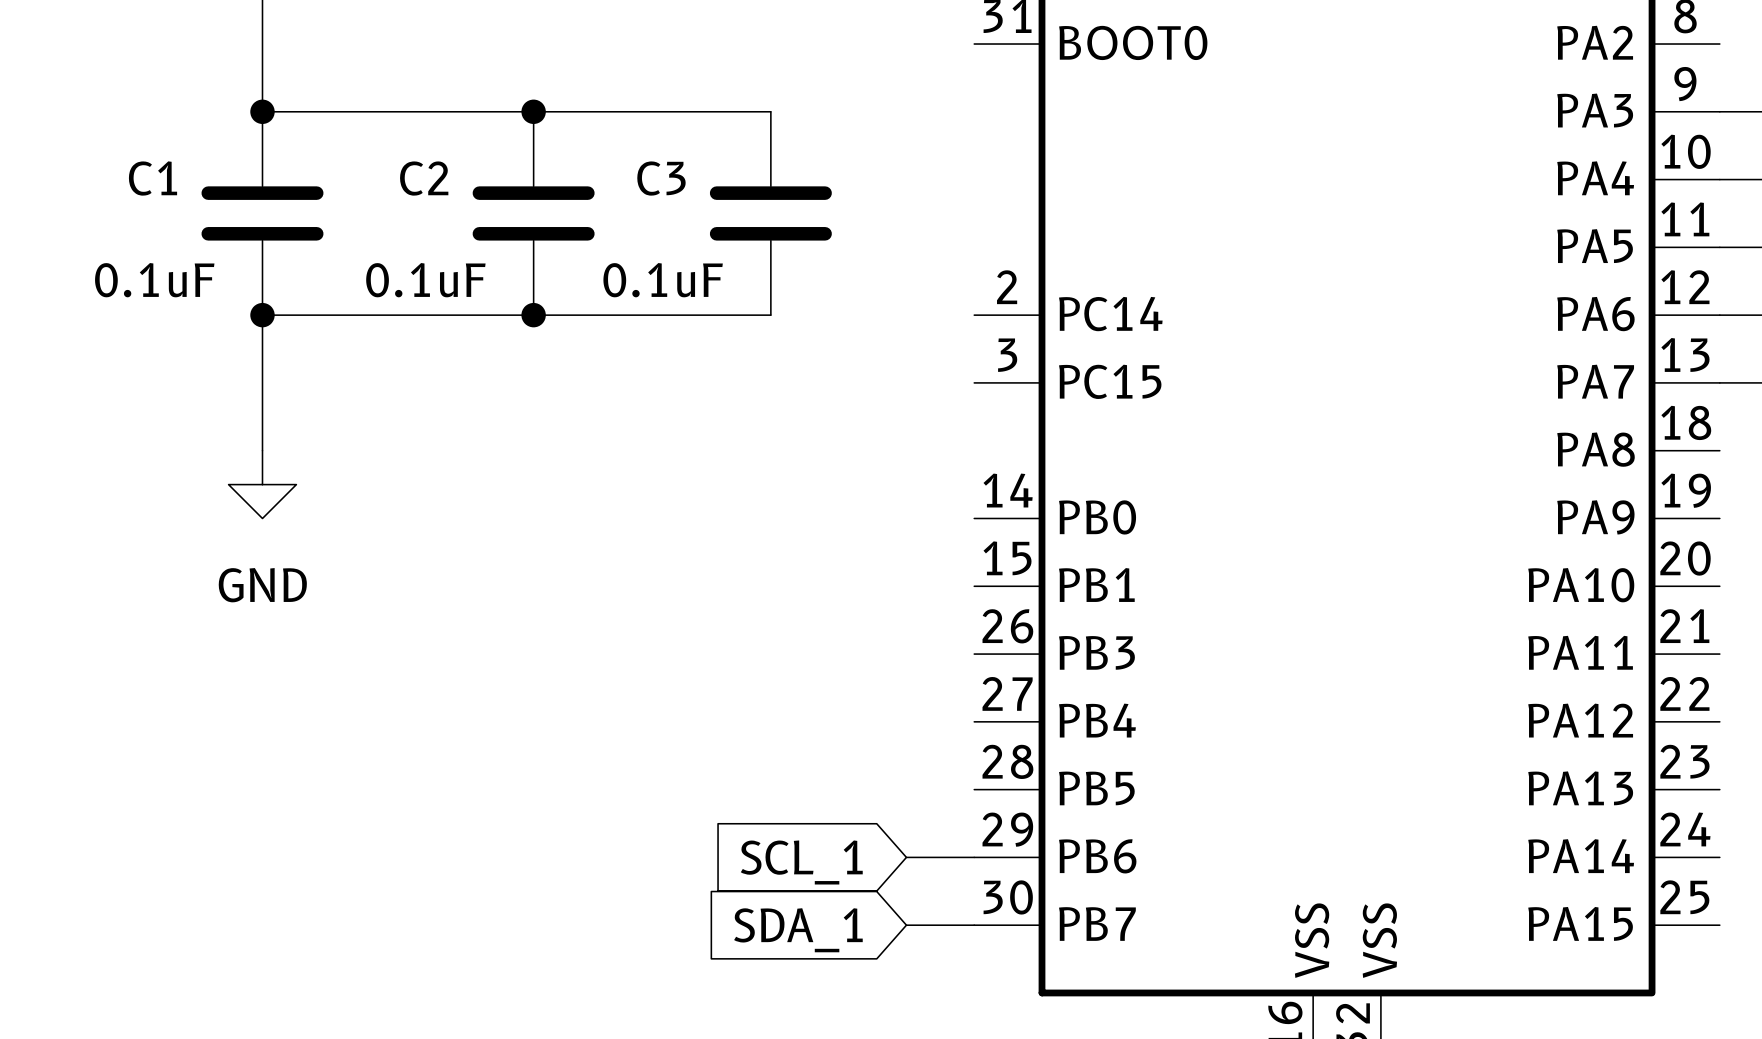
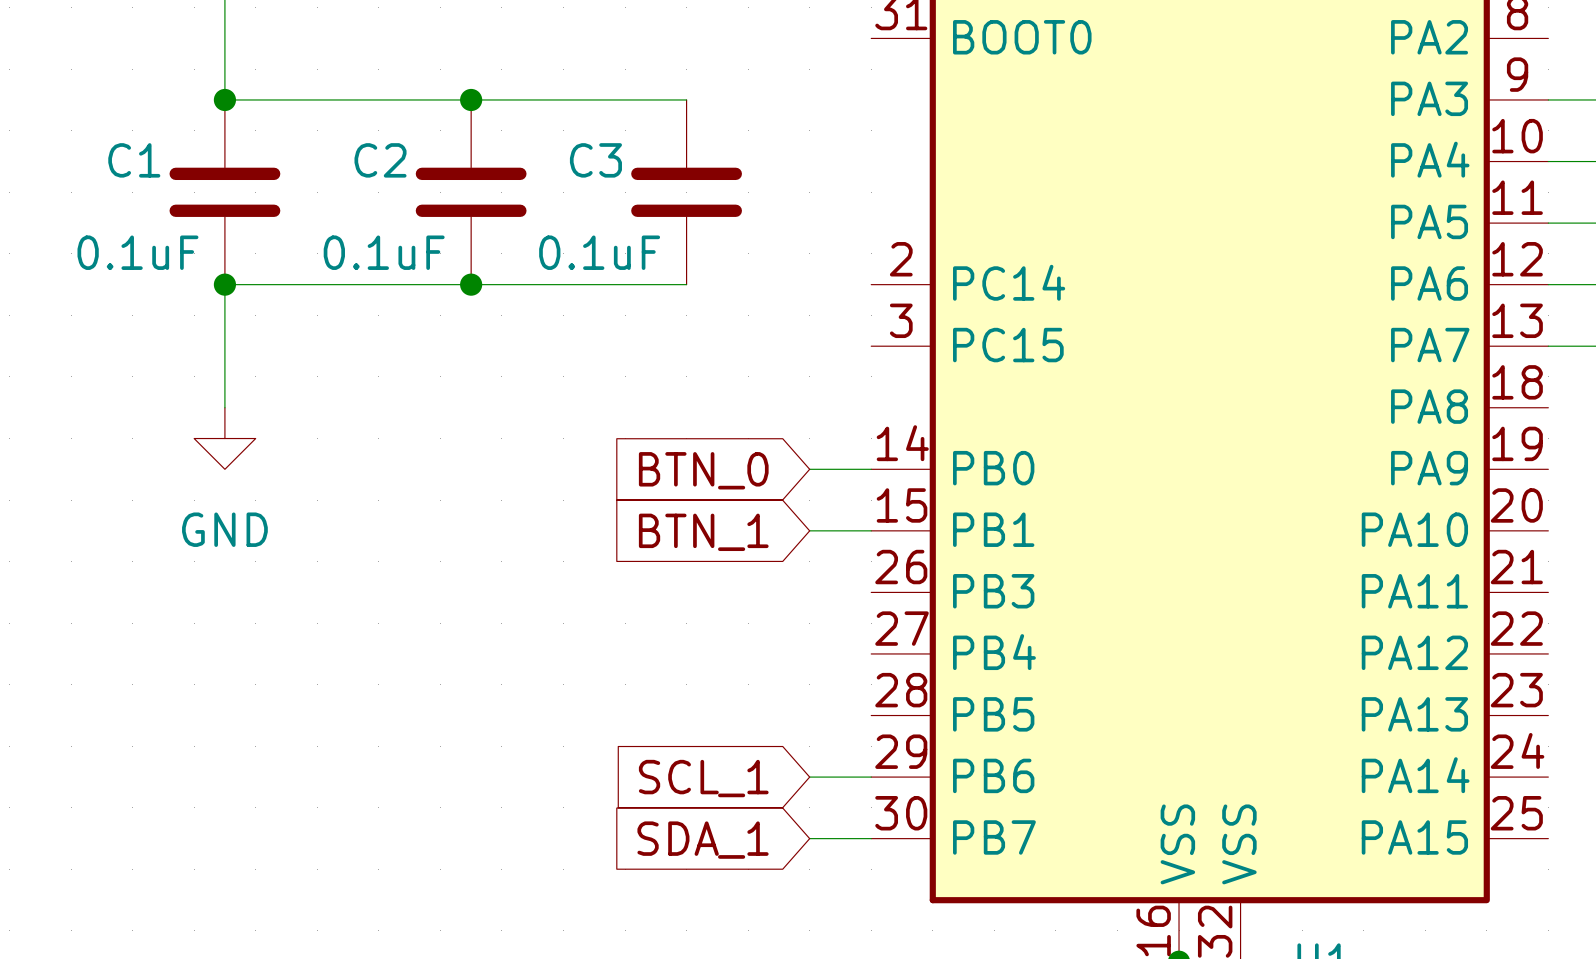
wire: none -> (809, 469) (871, 469)
global label: none -> BTN_0 (703, 470)
wire: none -> (809, 530) (871, 530)
global label: none -> BTN_1 (703, 532)

